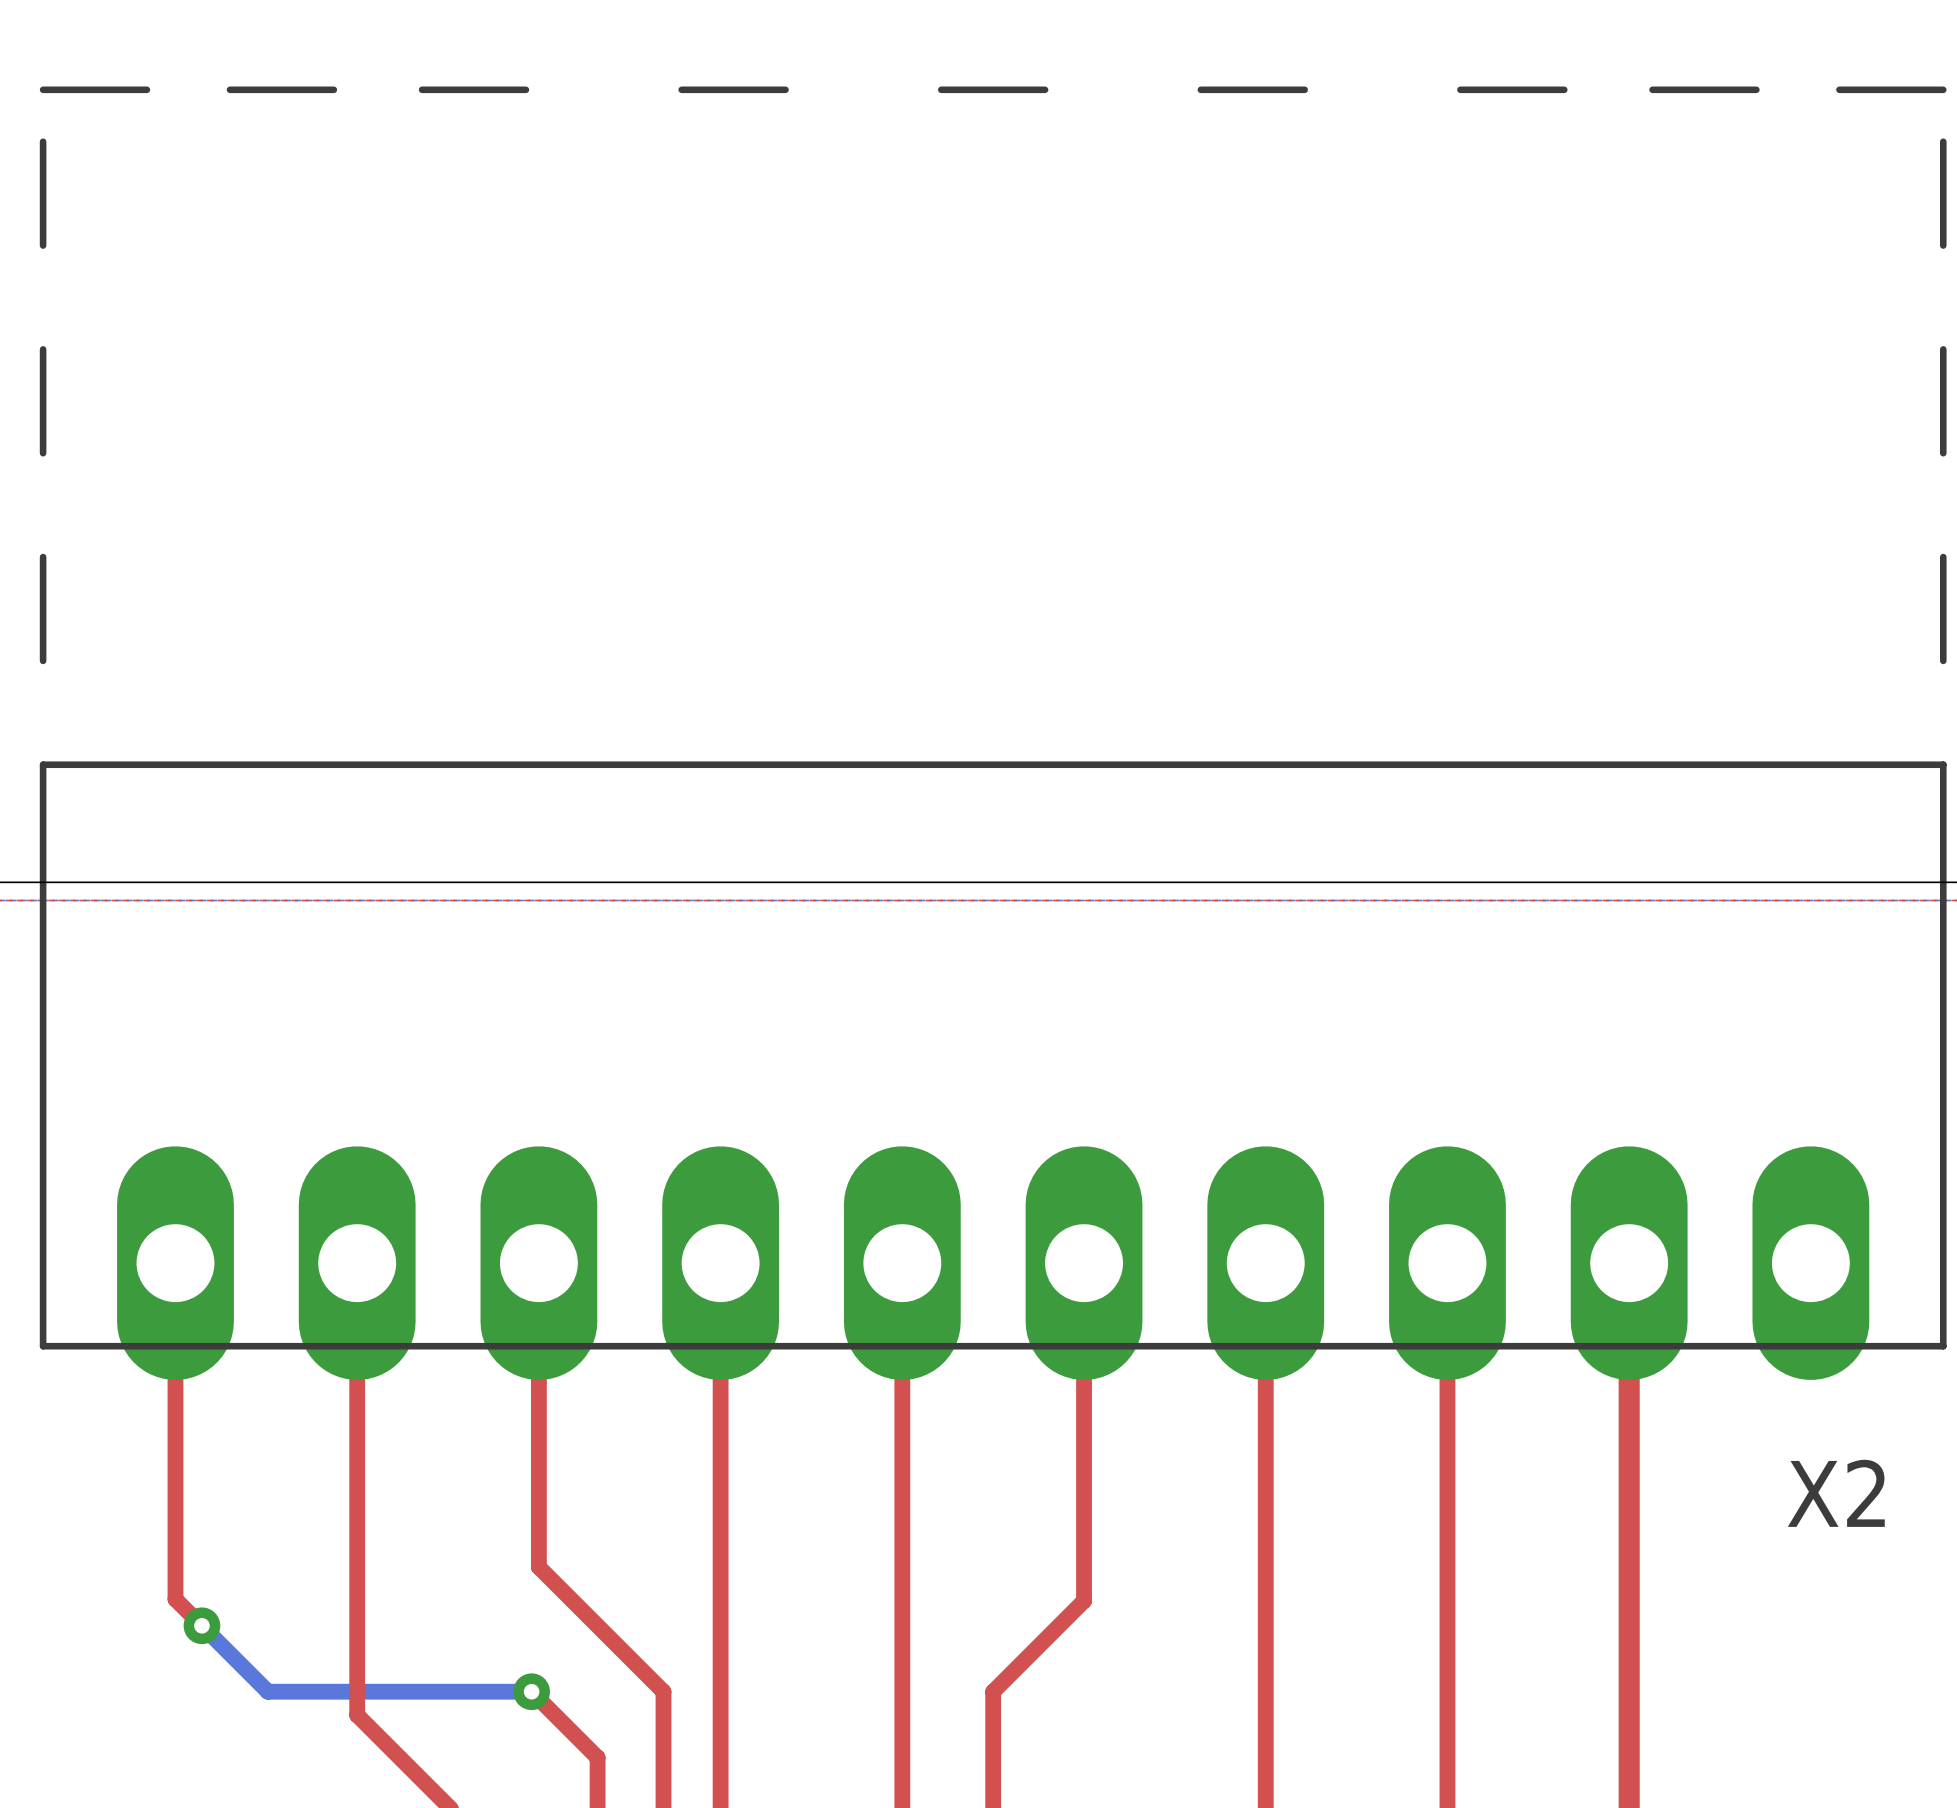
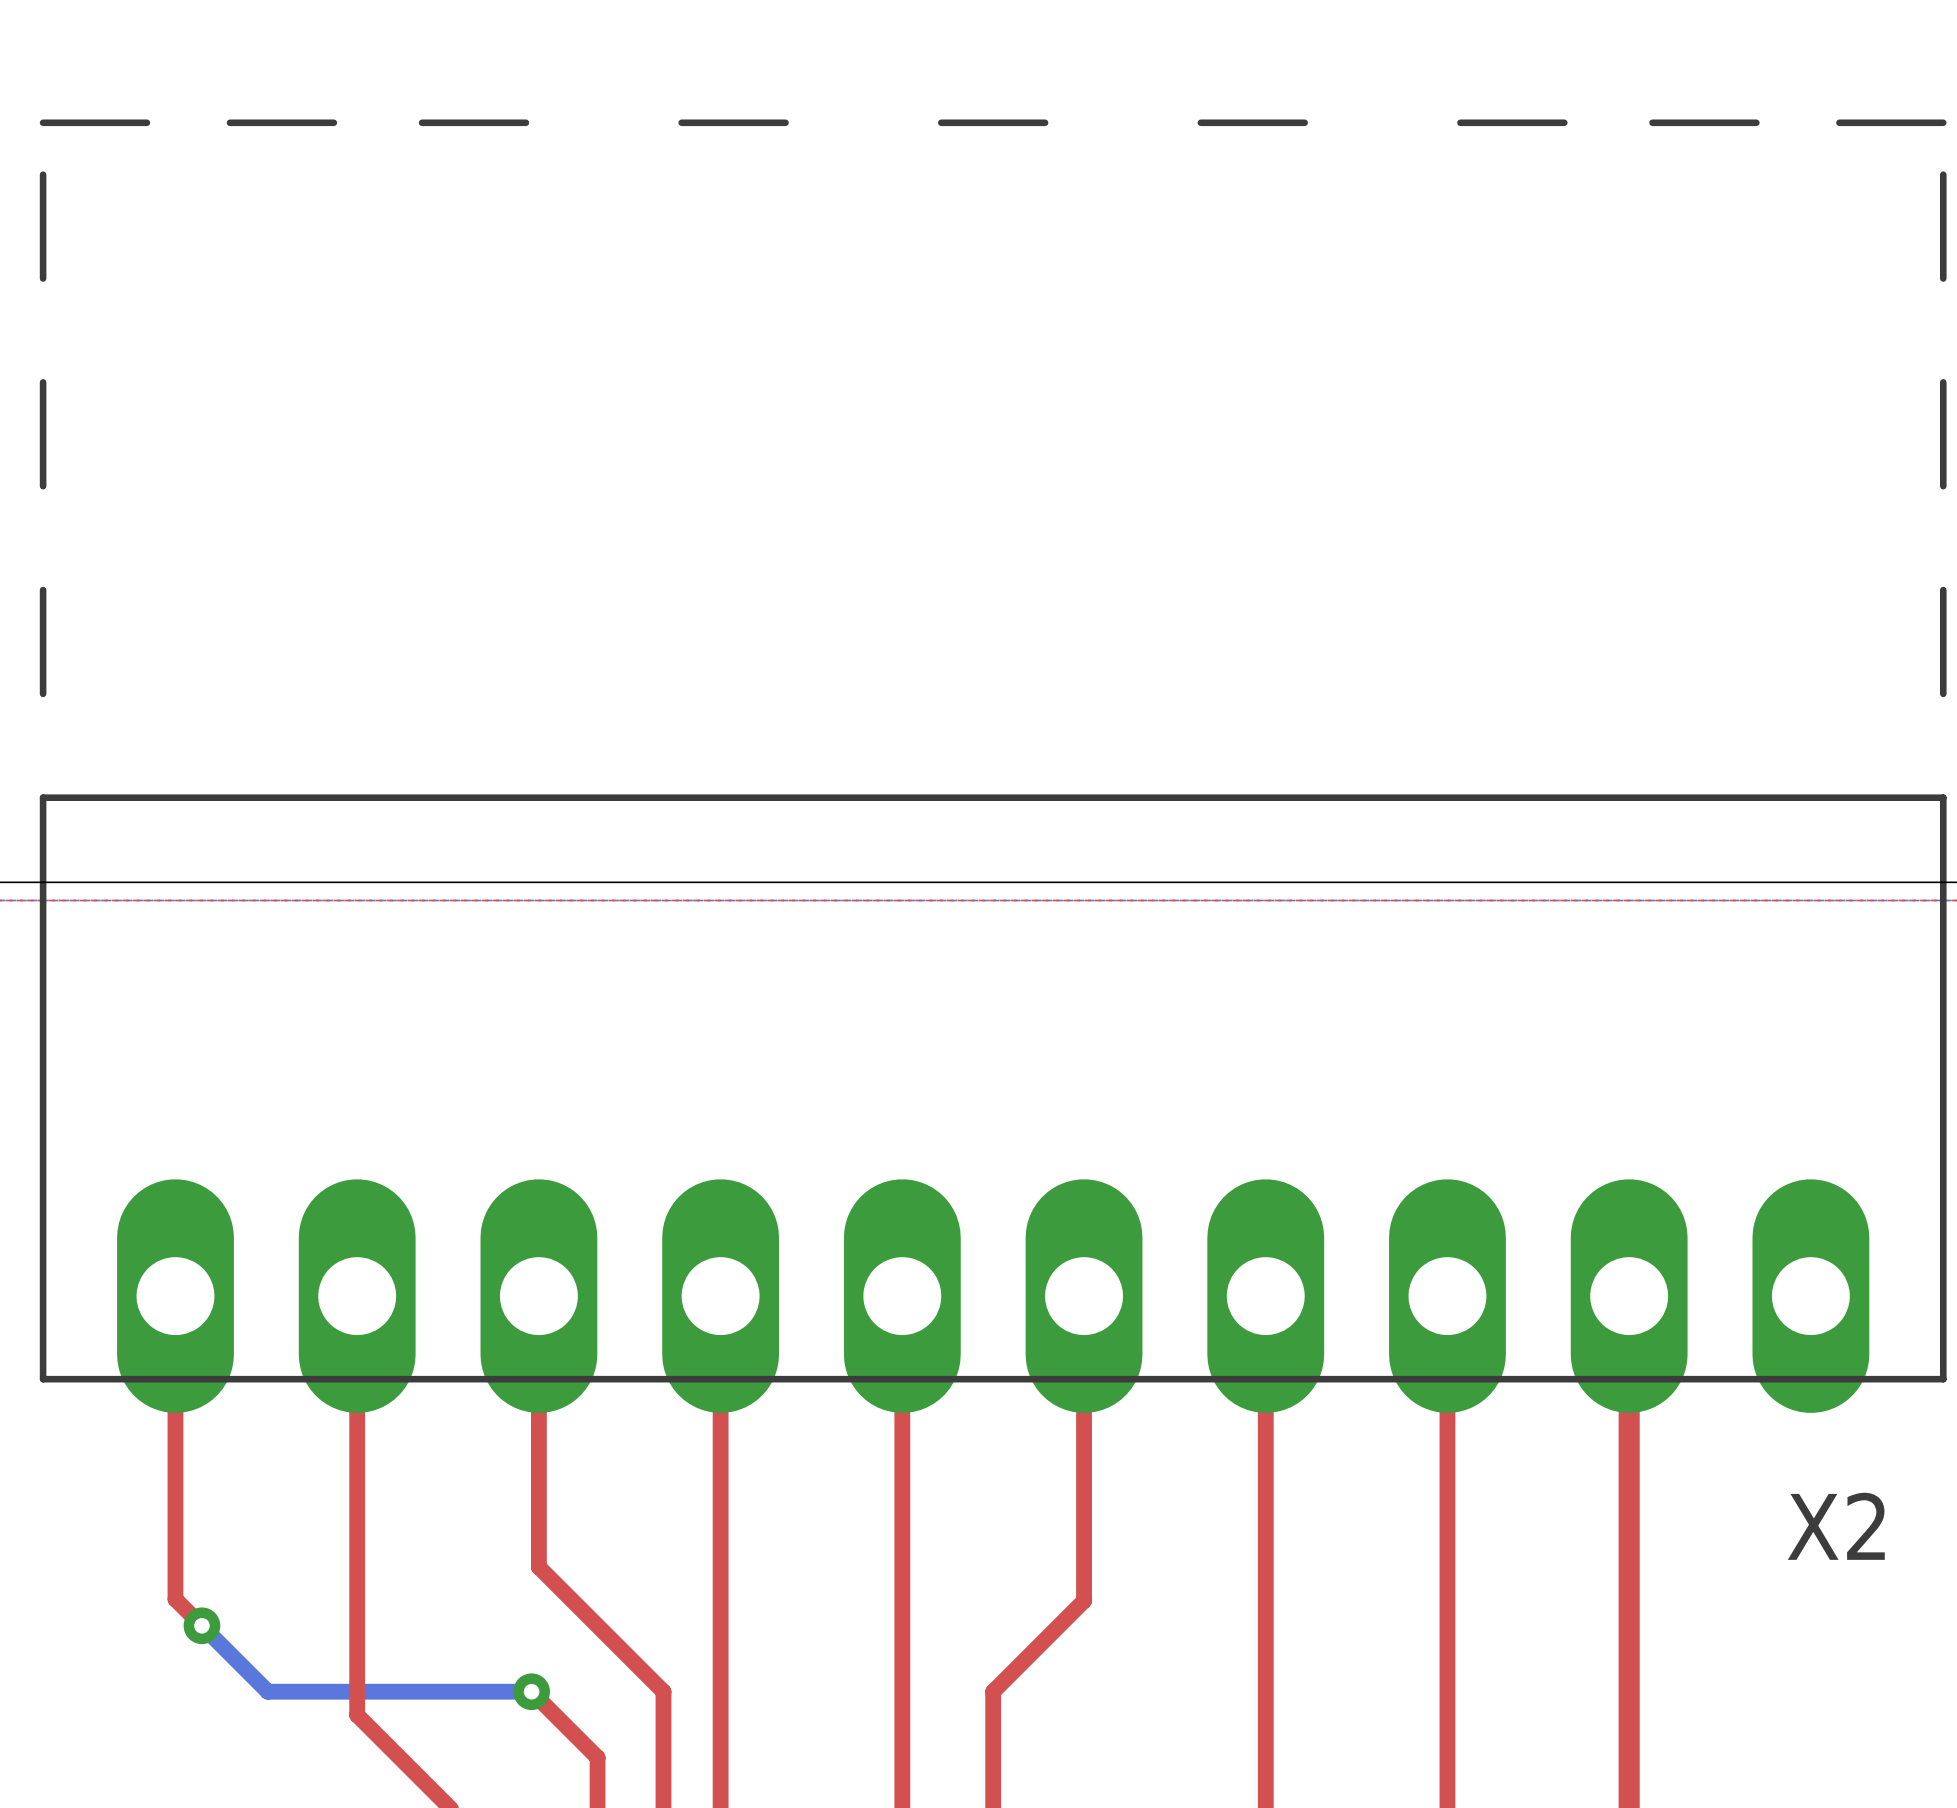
X2 position: (993, 733) -> (993, 766)

